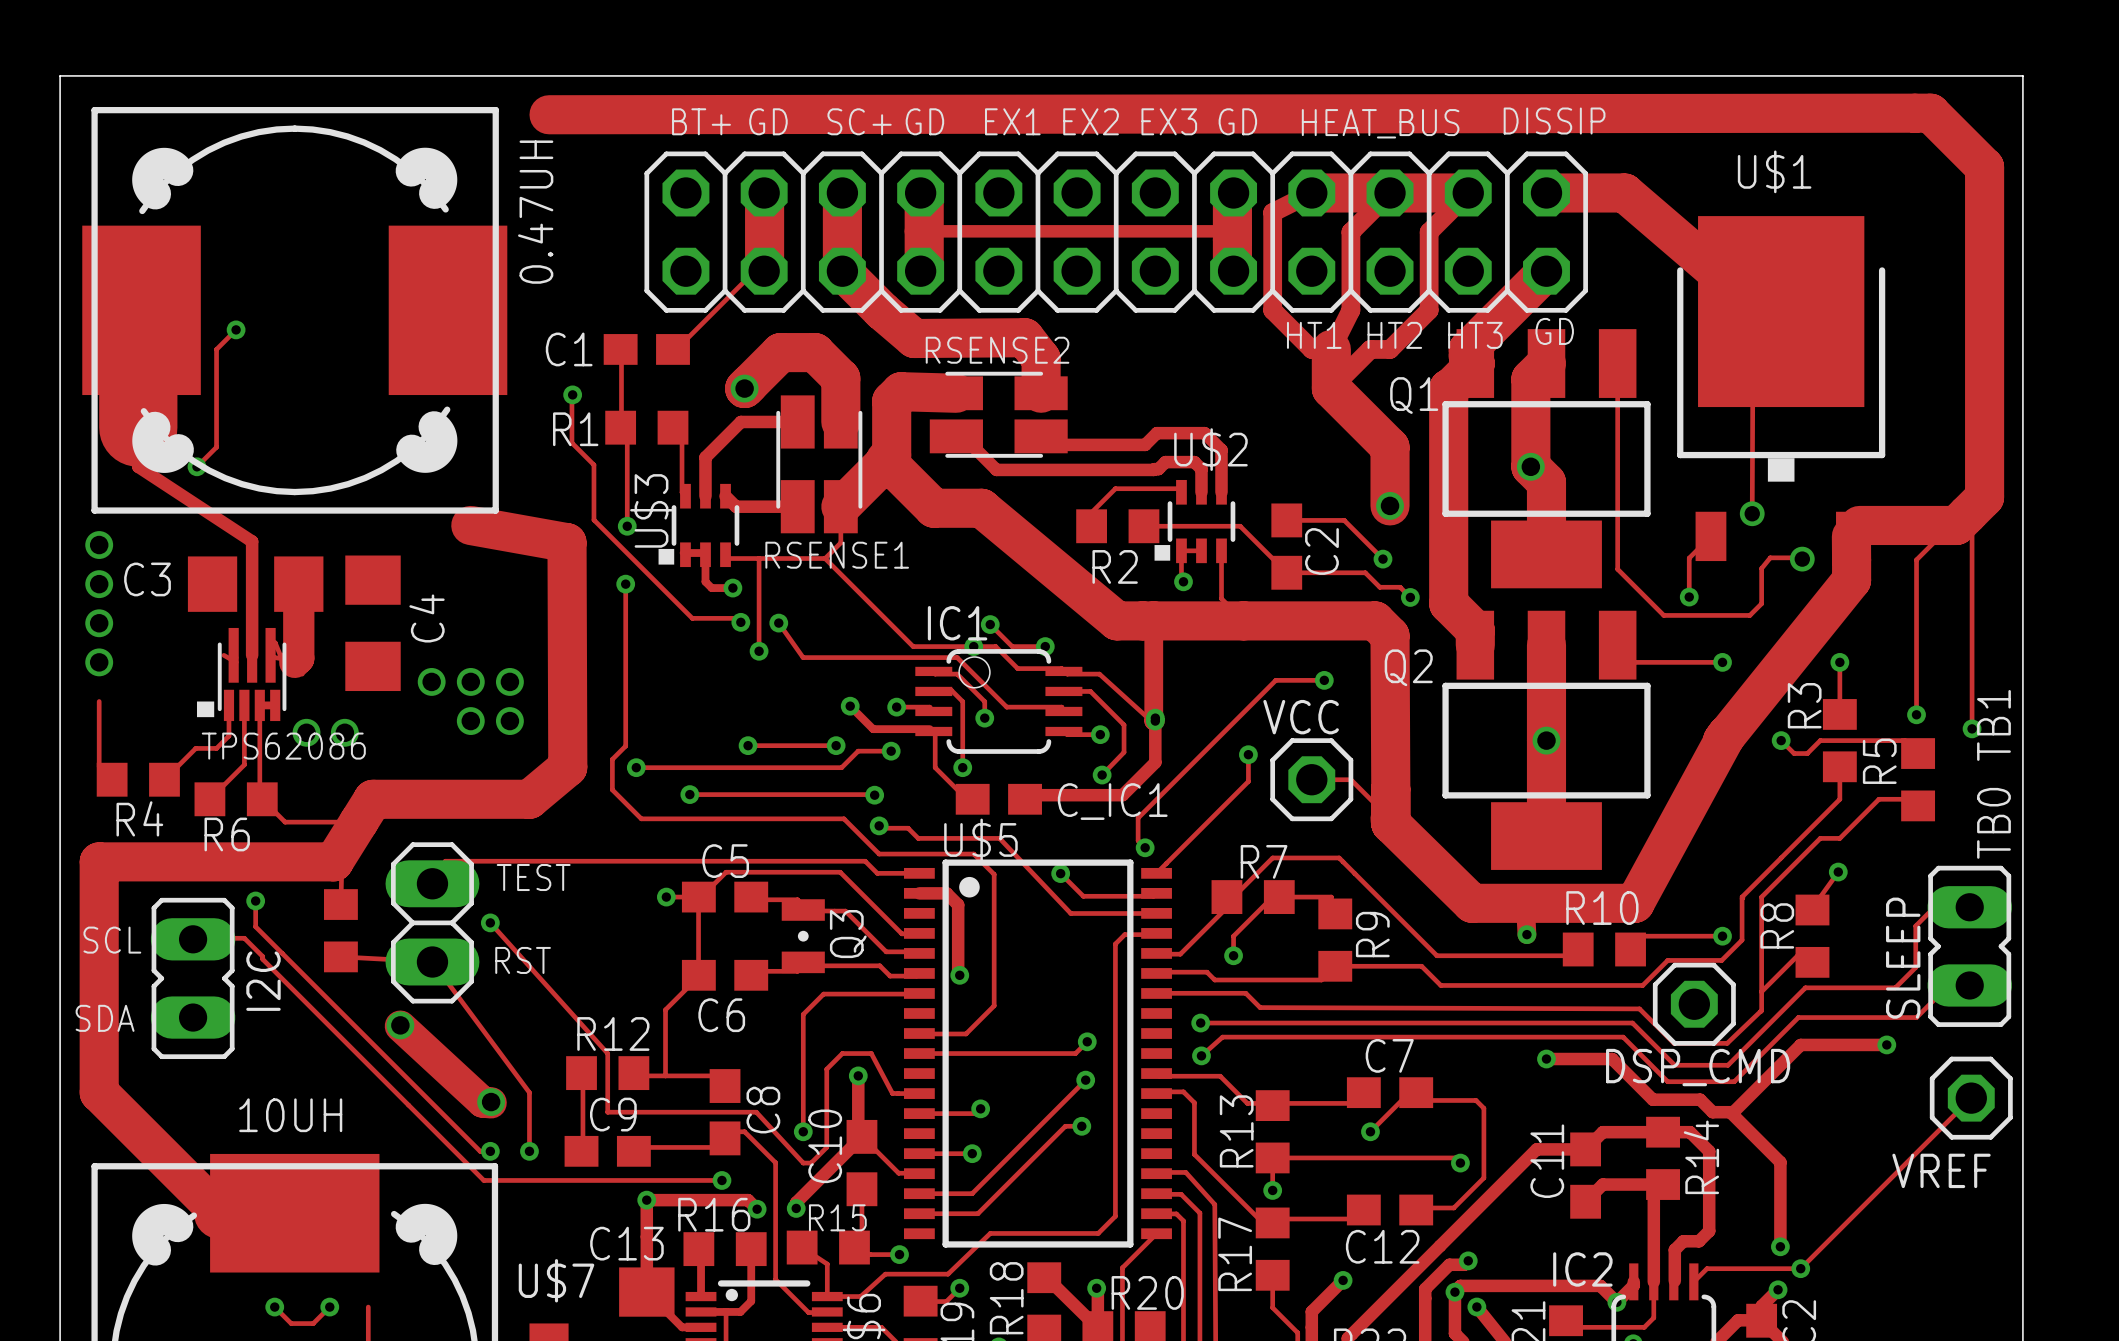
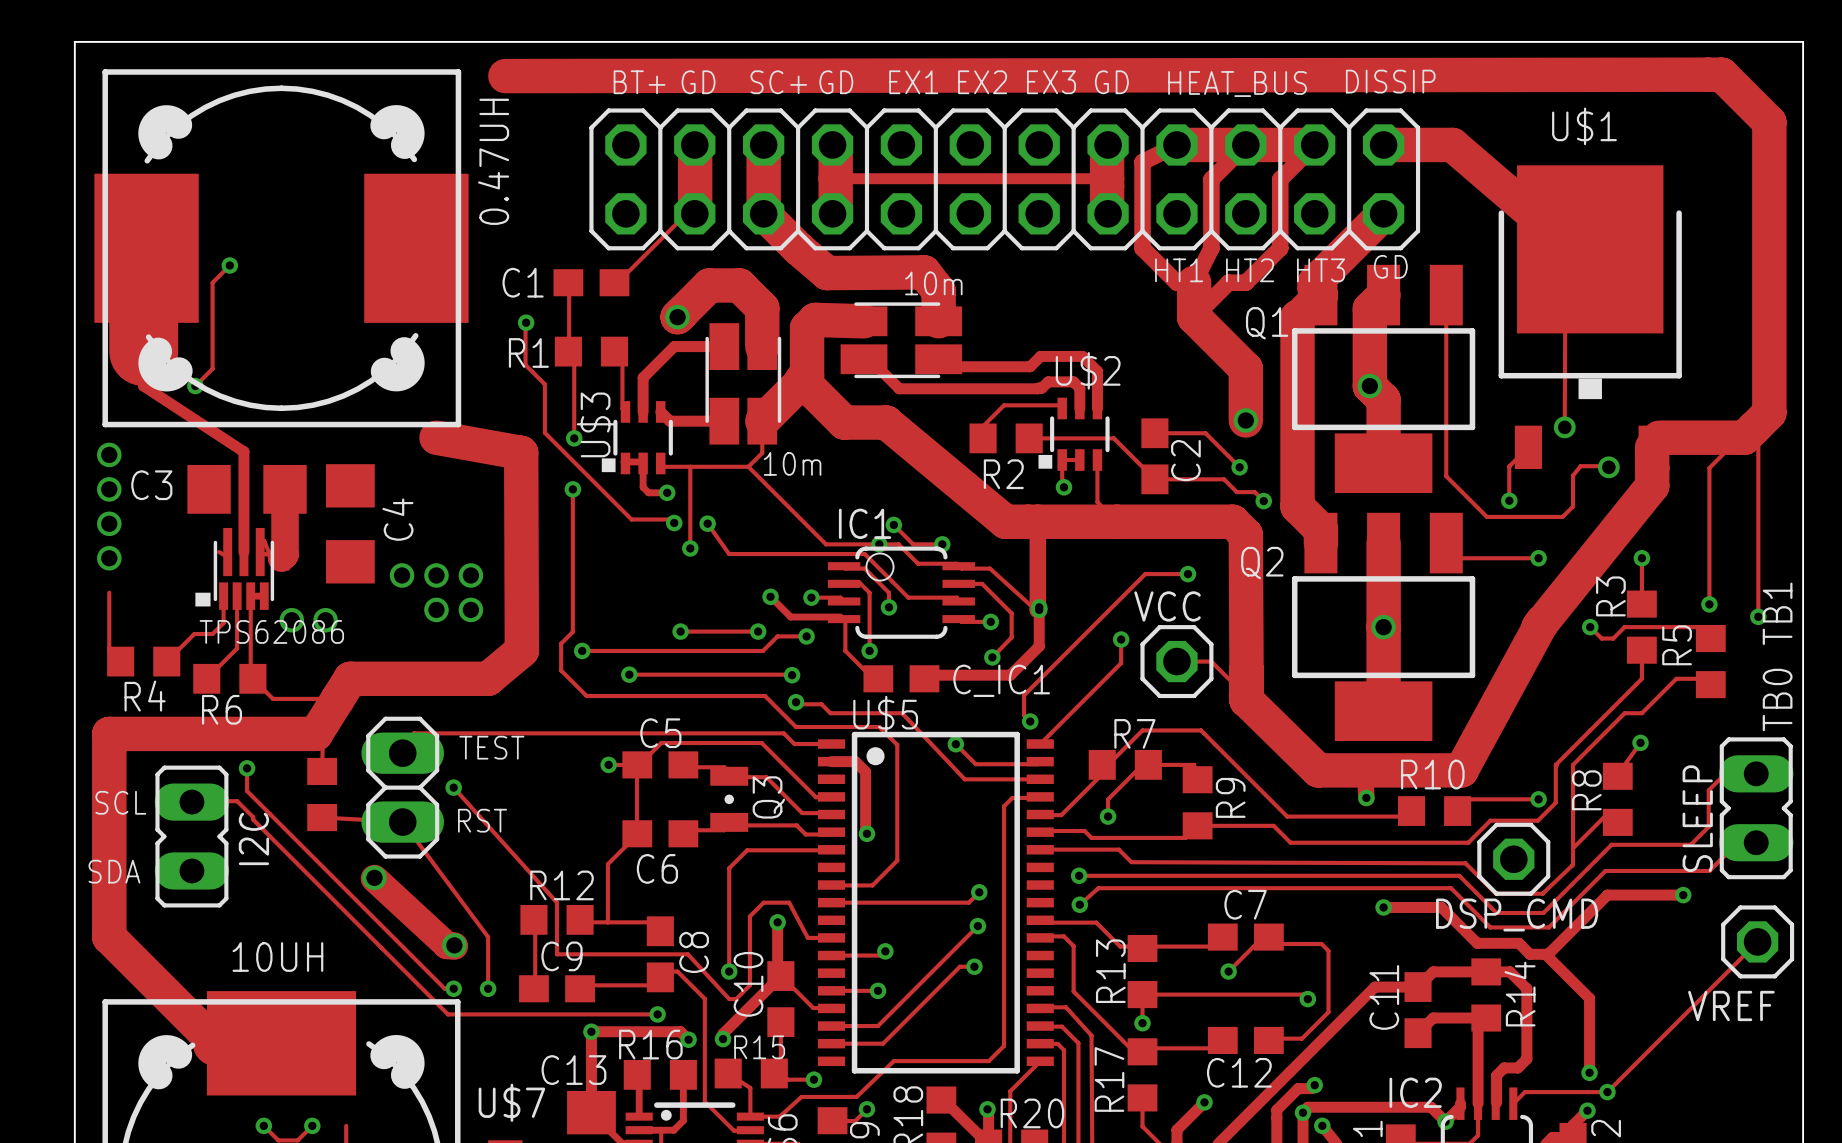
part value: RSENSE2 (997, 350) -> 10m (933, 283)
part value: RSENSE1 (837, 555) -> 10m (792, 463)

